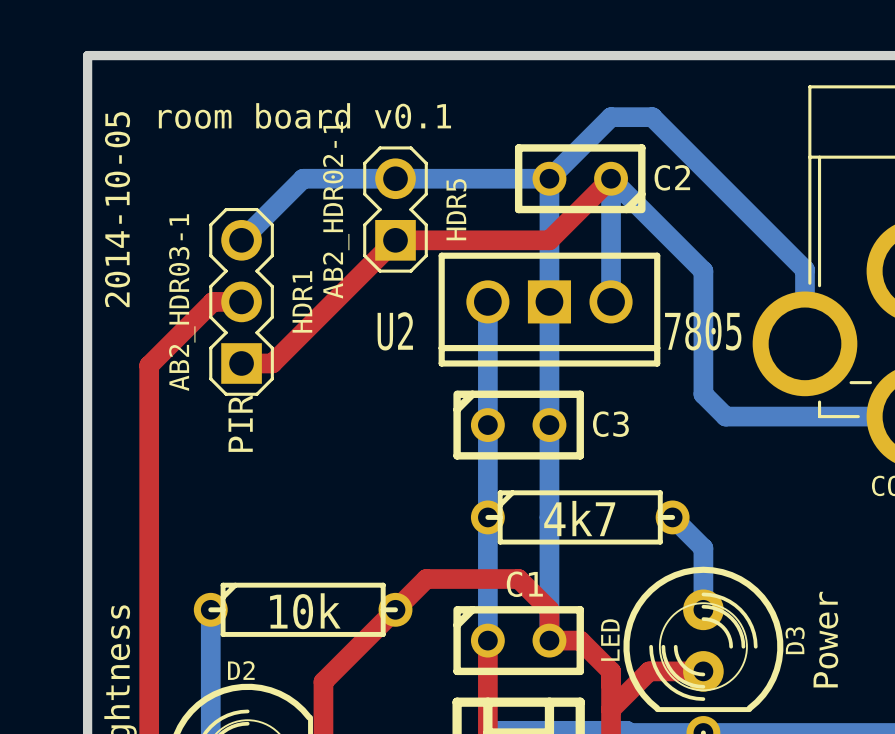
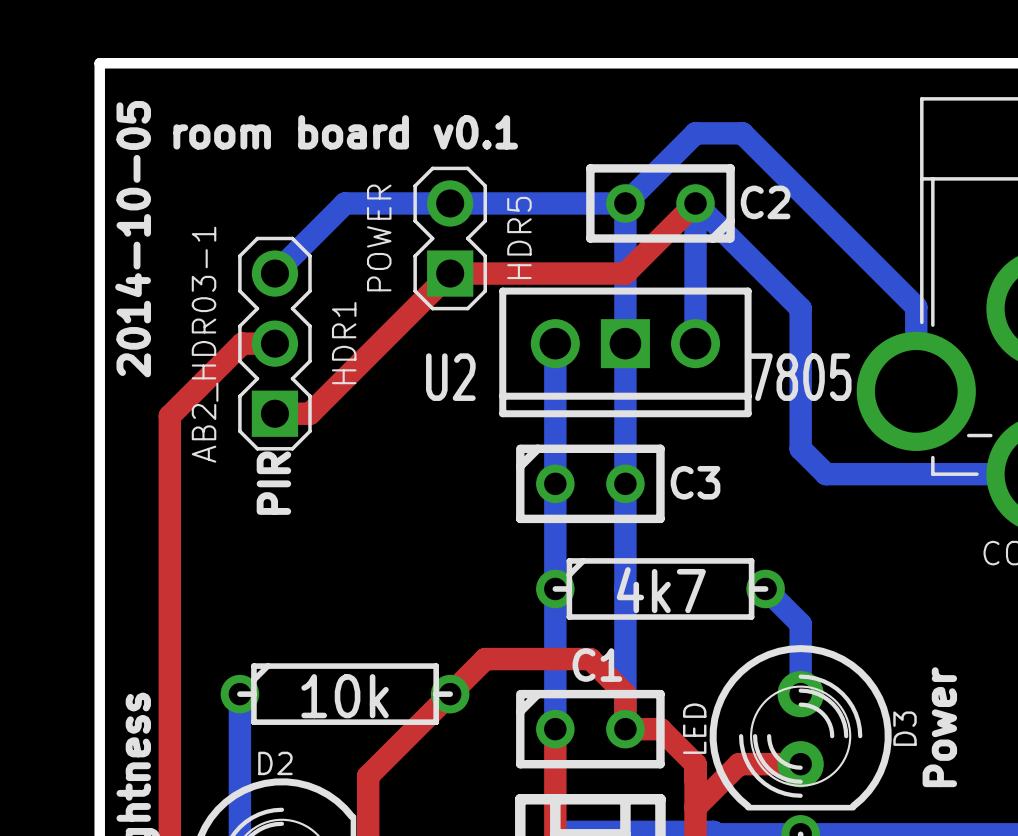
HDR5 value: AB2_HDR02-1 (336, 210) -> POWER (379, 237)

